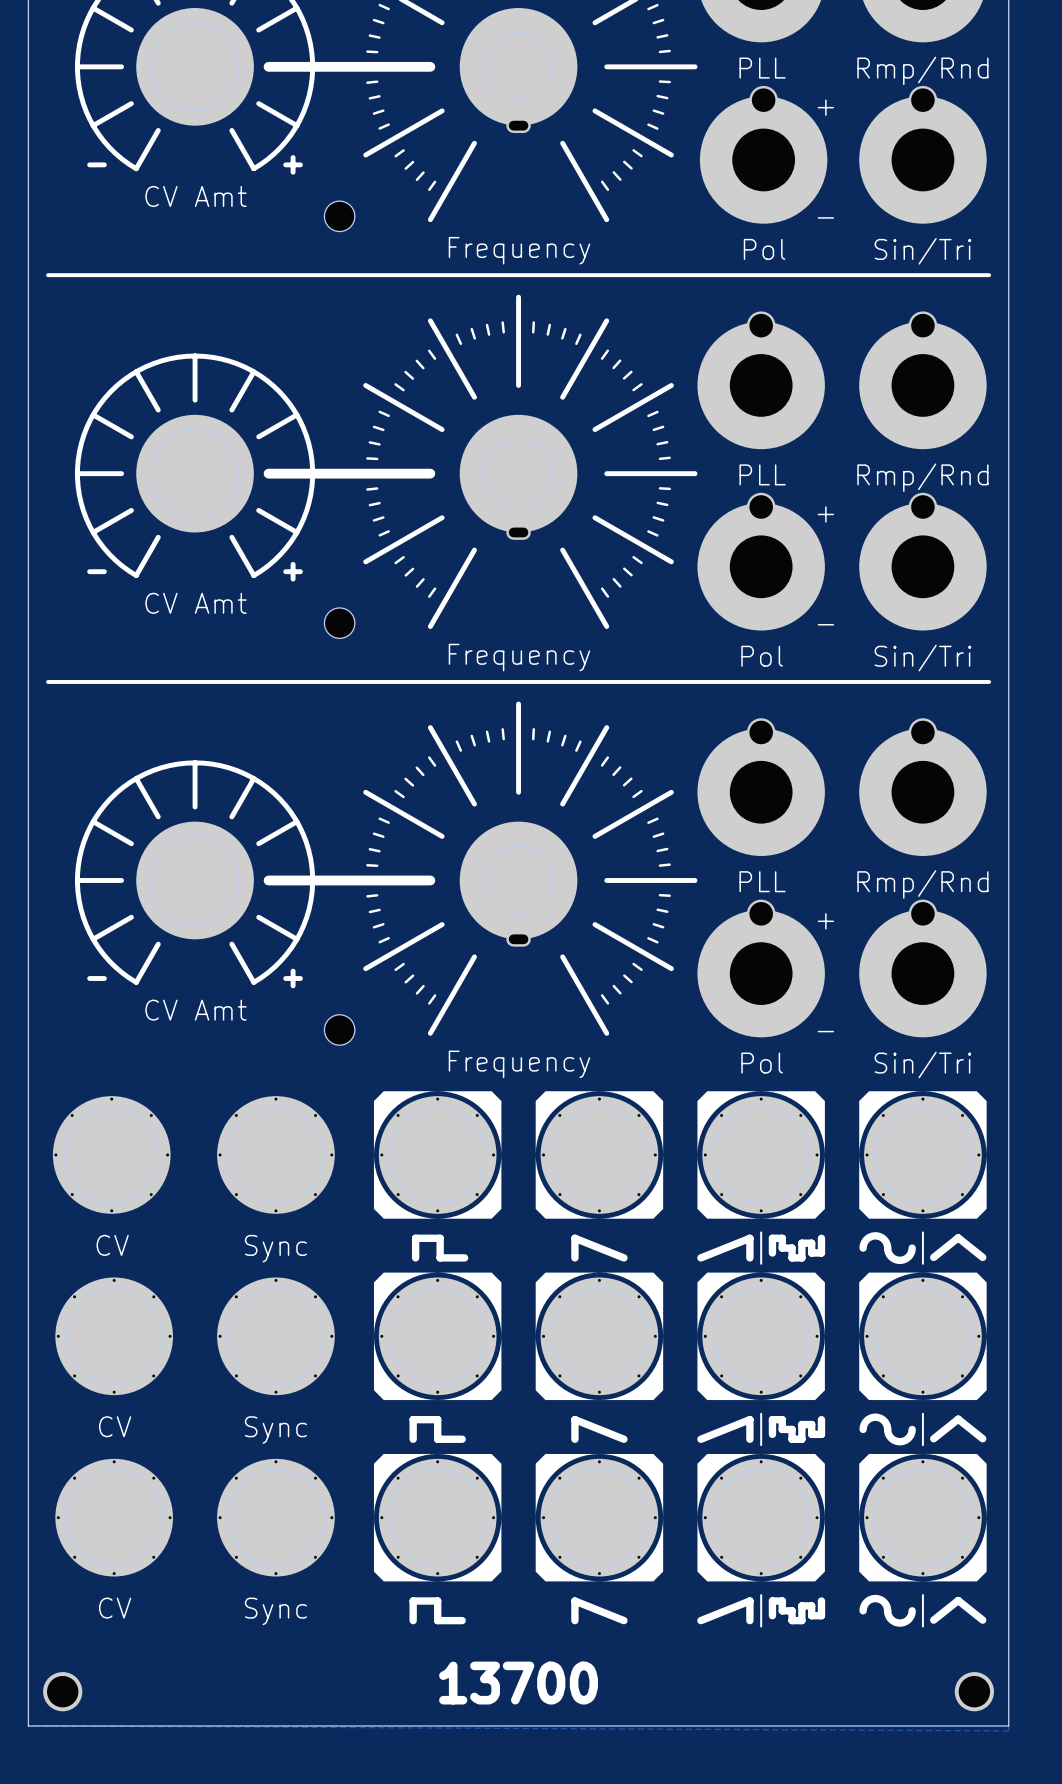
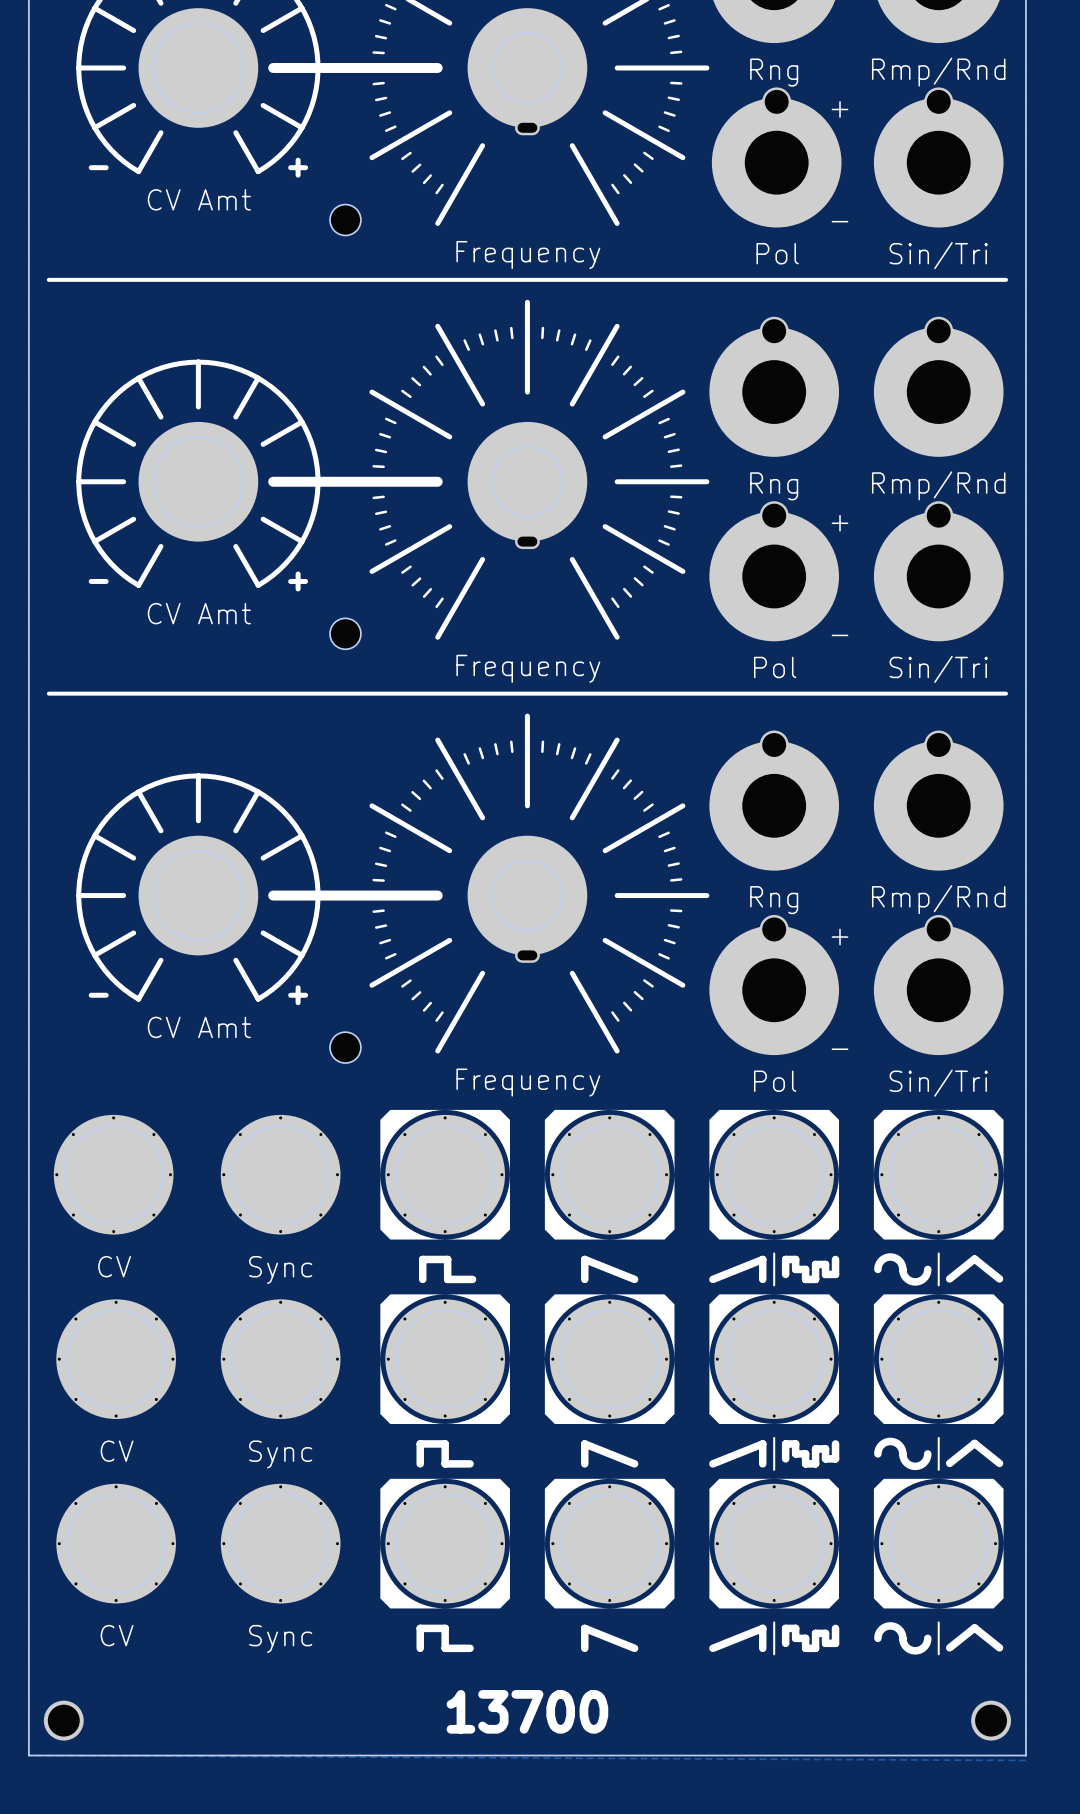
part value: PLL (762, 68) -> Rng (774, 72)
part value: PLL (762, 474) -> Rng (774, 486)
part value: PLL (762, 881) -> Rng (774, 900)

